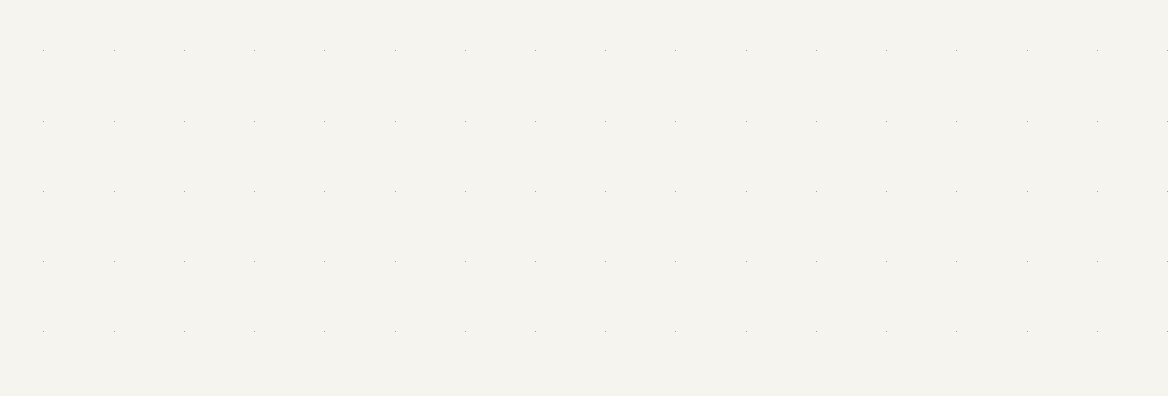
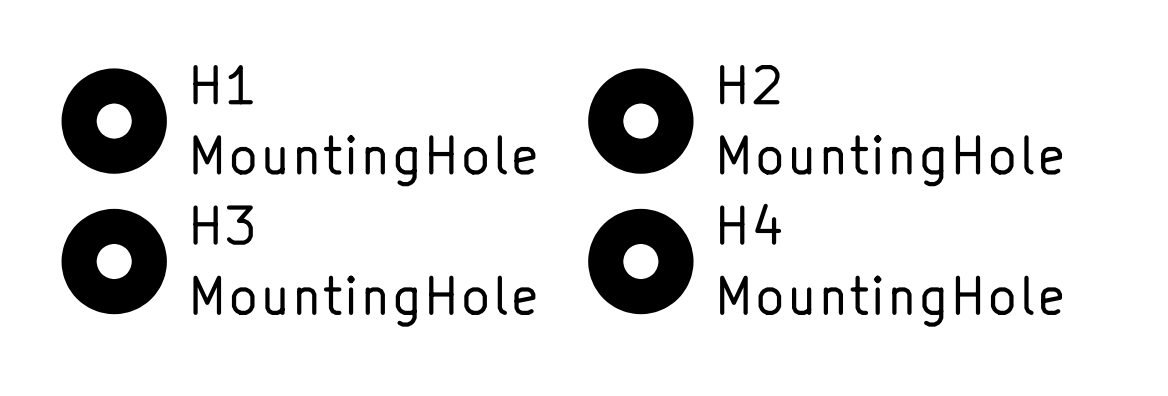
H1: none -> MountingHole (114, 121)
H2: none -> MountingHole (640, 121)
H3: none -> MountingHole (114, 261)
H4: none -> MountingHole (640, 261)

